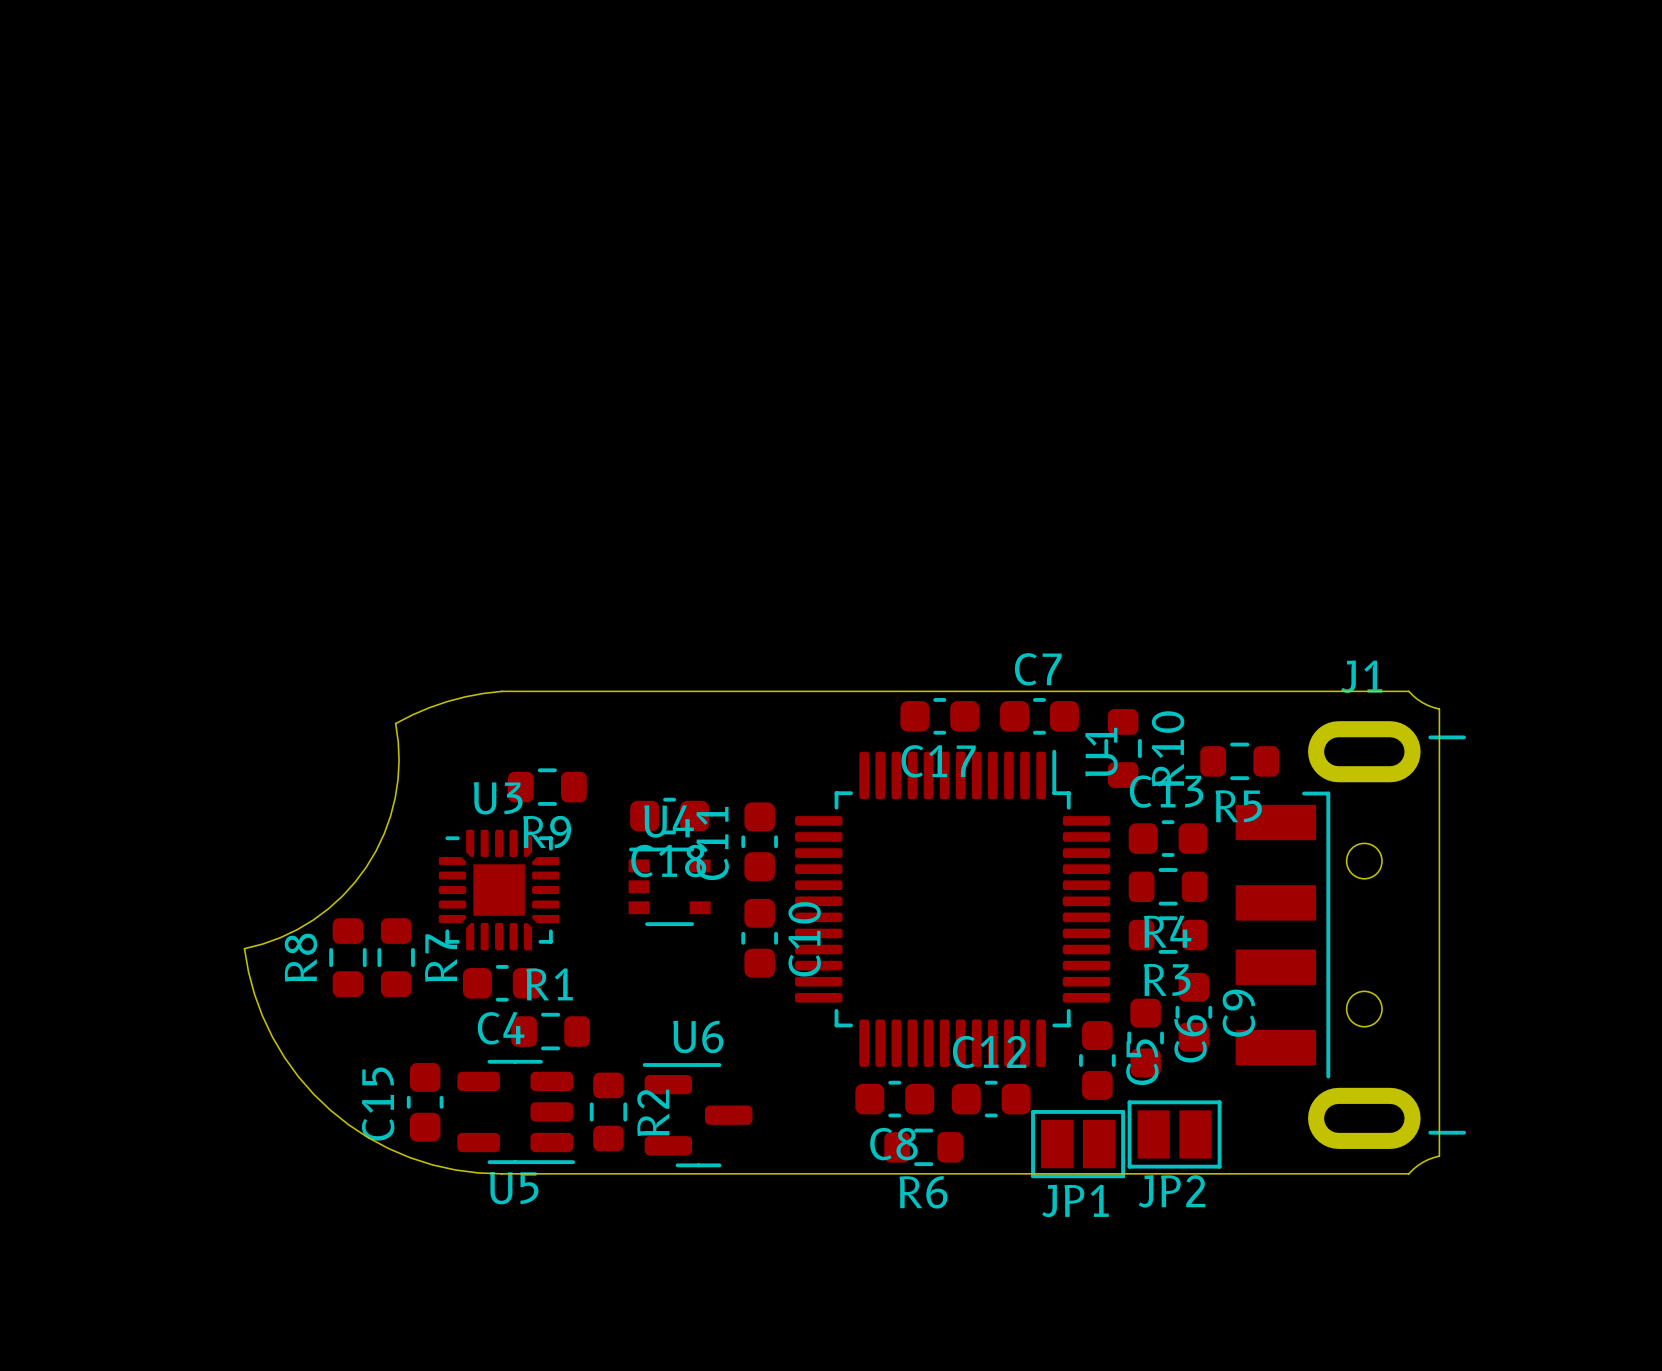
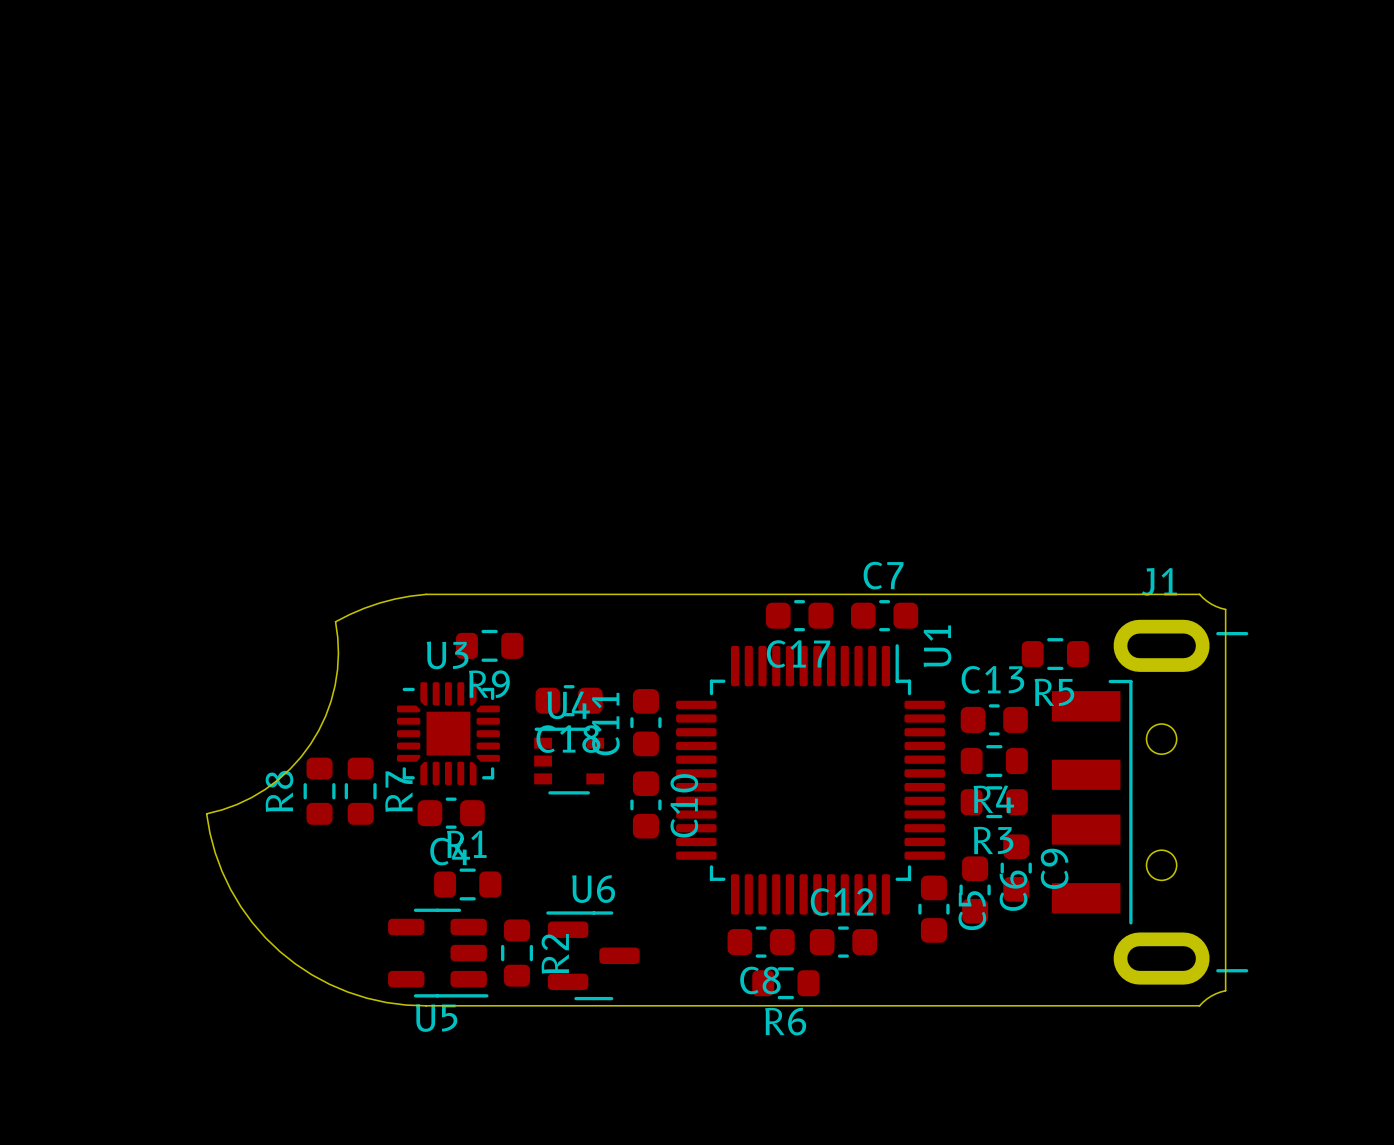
R10: (1123, 748) -> none
R9 position: (547, 787) -> (489, 645)
U3 position: (499, 890) -> (448, 733)
R8 position: (347, 957) -> (319, 791)
R7 position: (396, 957) -> (360, 791)
C4 position: (502, 983) -> (451, 813)
C15: (425, 1102) -> none
JP2: (1174, 1134) -> none
JP1: (1078, 1144) -> none

